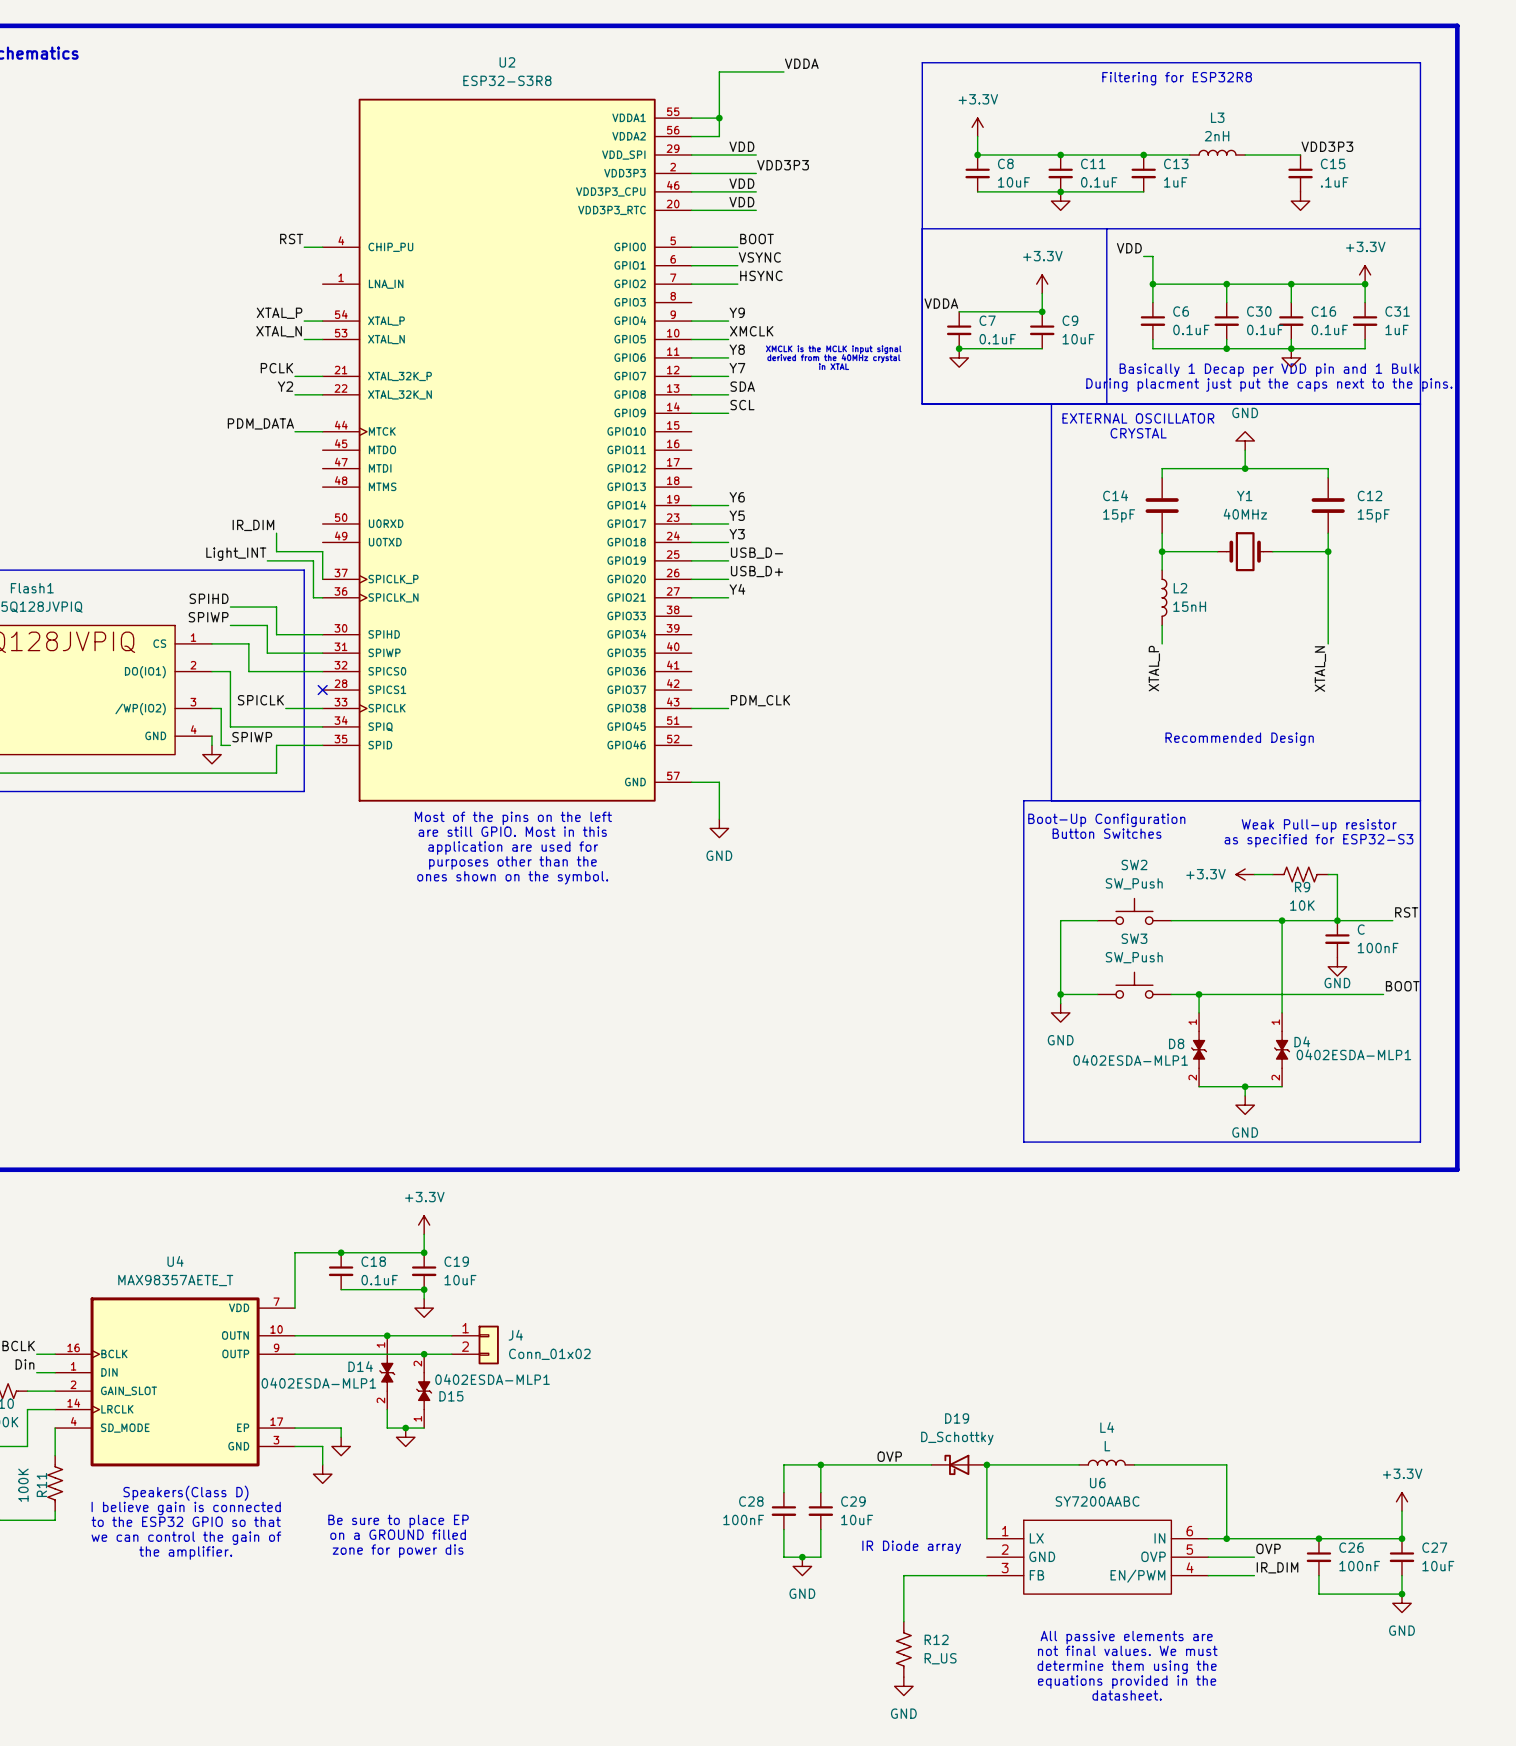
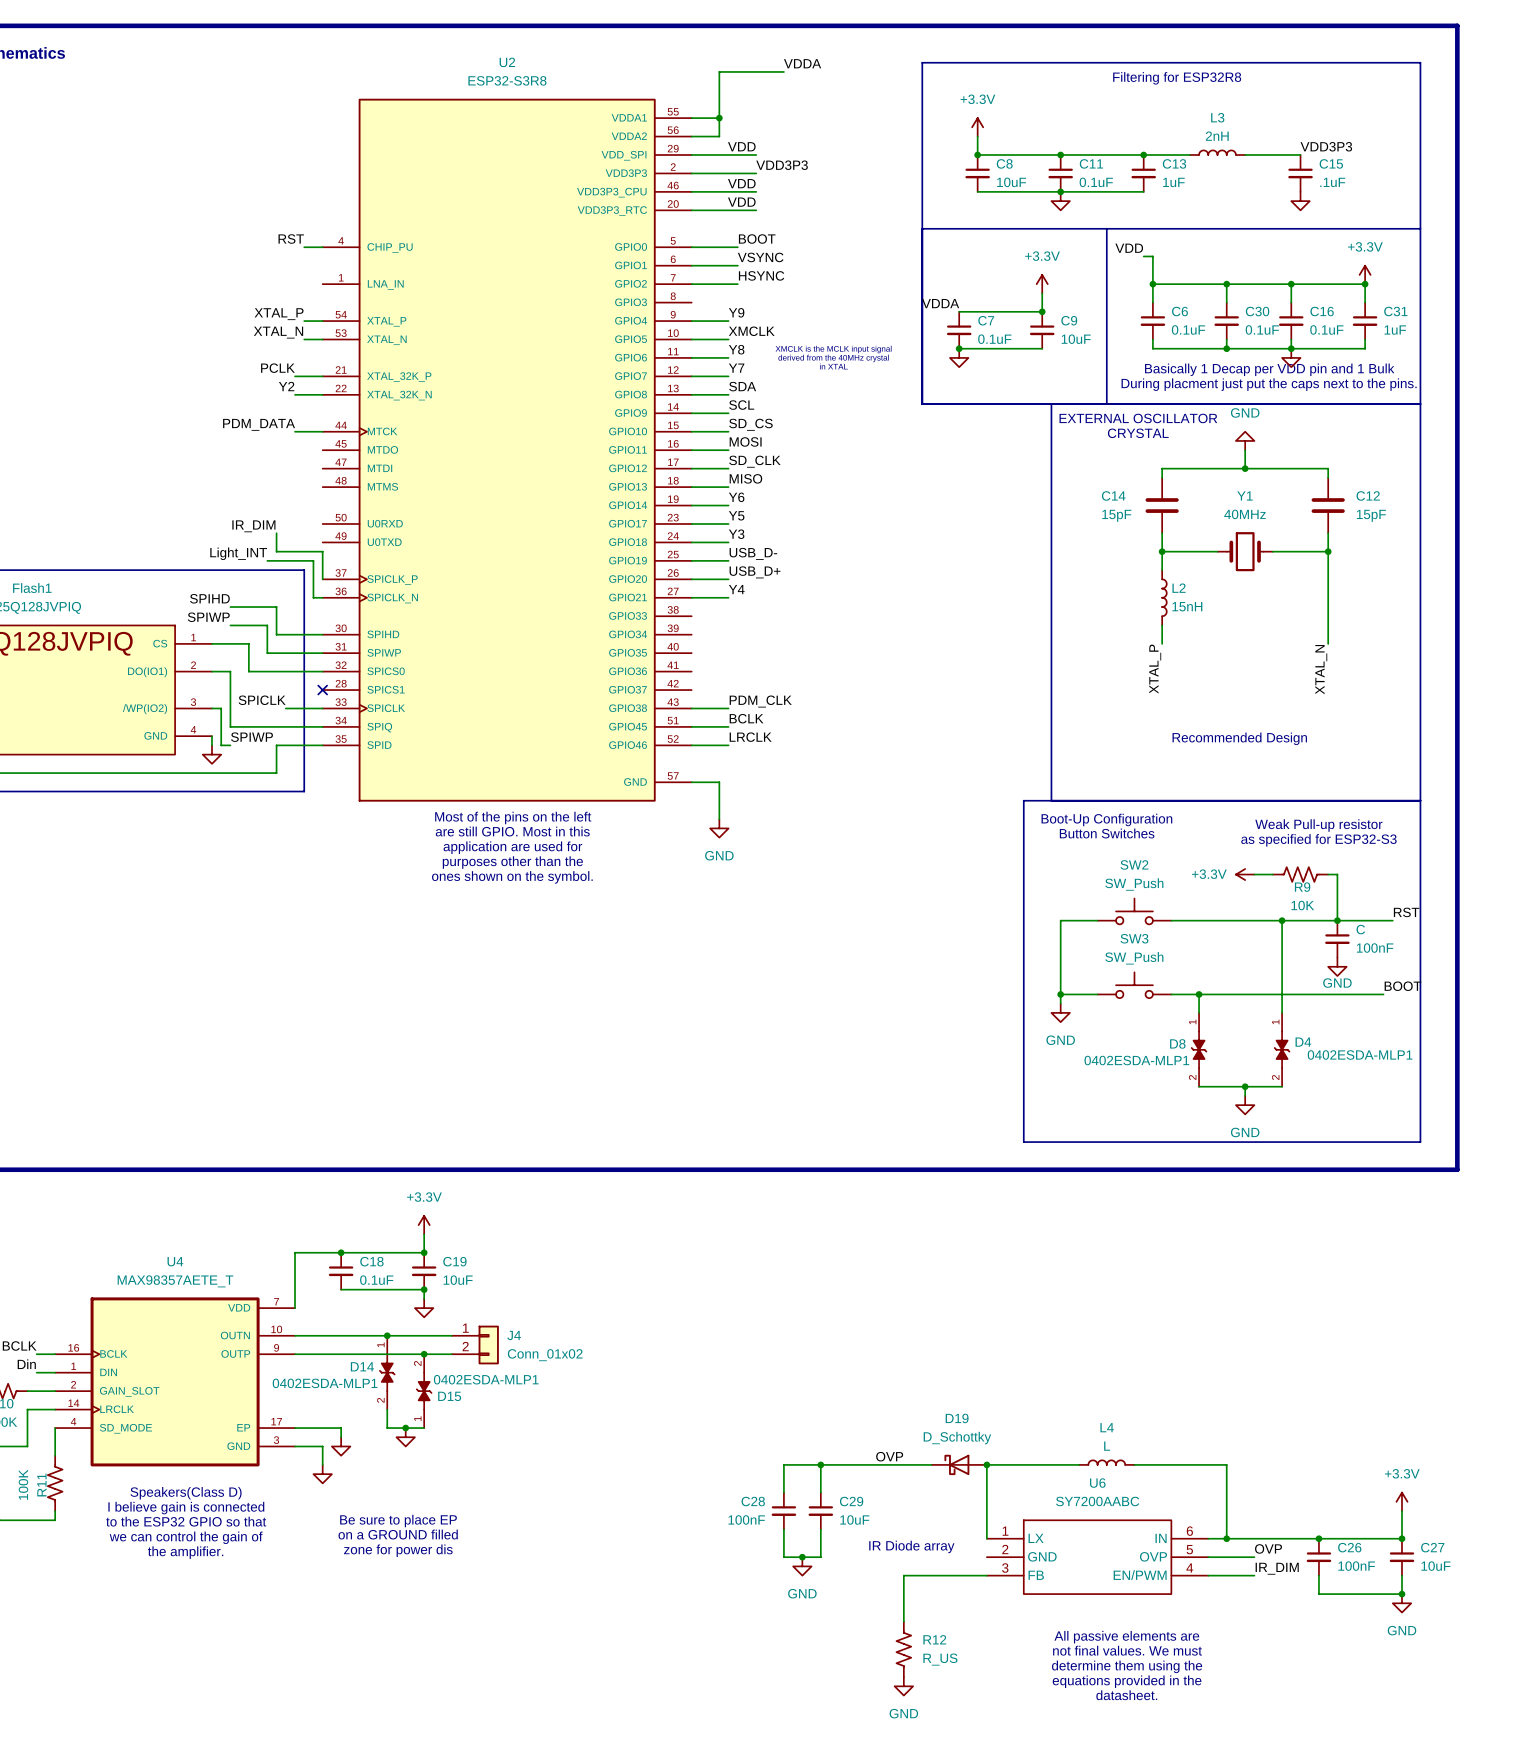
label: none -> SD_CS (750, 424)
wire: none -> (691, 431) (728, 431)
label: none -> MOSI (745, 441)
wire: none -> (691, 450) (728, 450)
label: none -> SD_CLK (754, 461)
wire: none -> (691, 468) (728, 468)
label: none -> MISO (745, 478)
wire: none -> (691, 487) (728, 487)
label: none -> BCLK (746, 718)
wire: none -> (691, 726) (728, 726)
label: none -> LRCLK (750, 737)
wire: none -> (691, 745) (728, 745)

